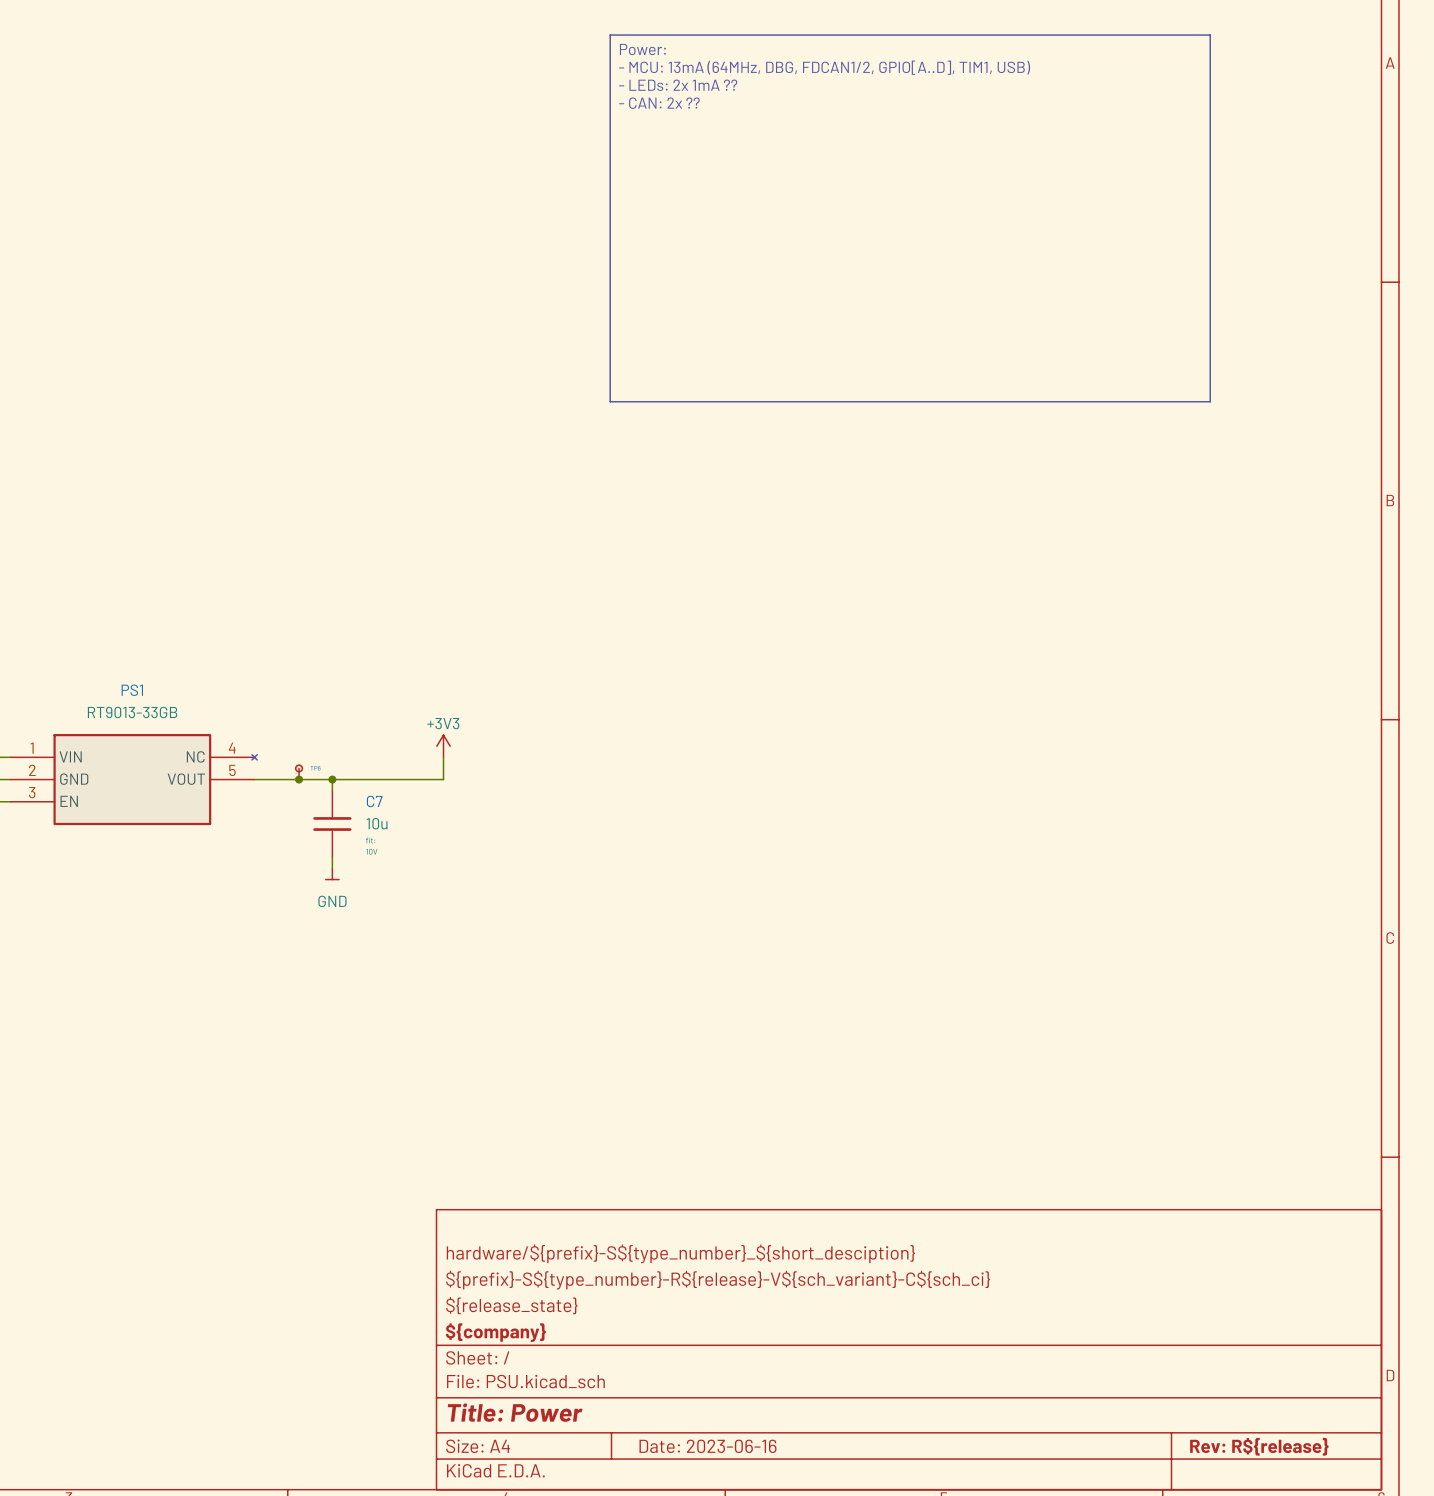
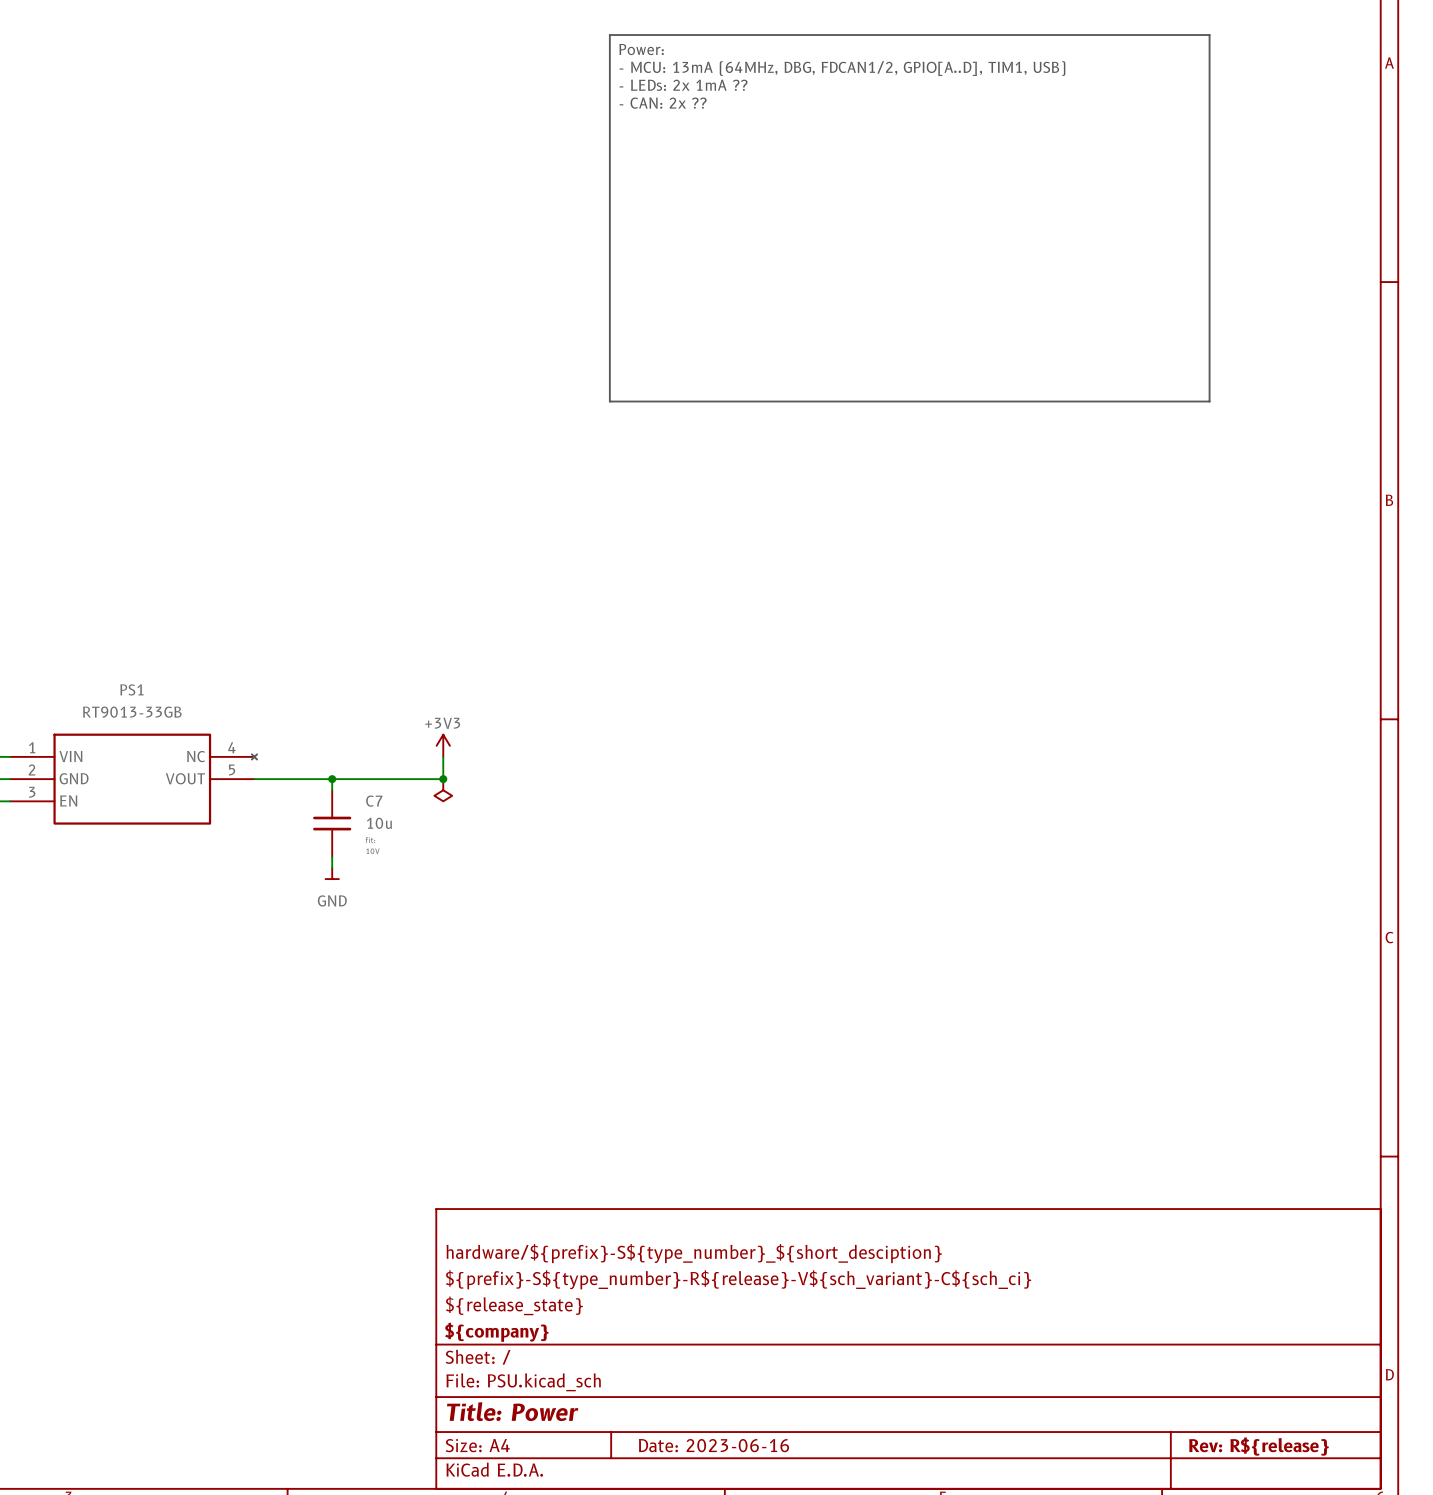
part: (299, 772) -> none
junction: (299, 779) -> none
junction: none -> (443, 779)
power symbol: none -> (443, 790)

